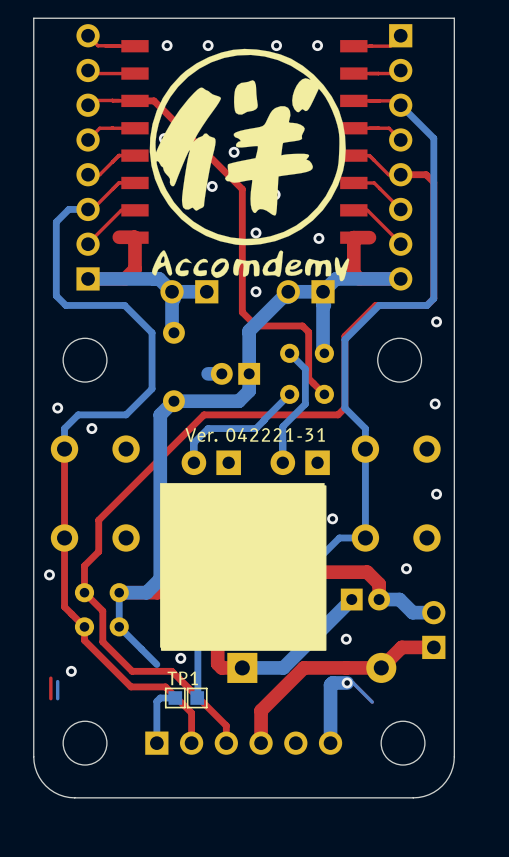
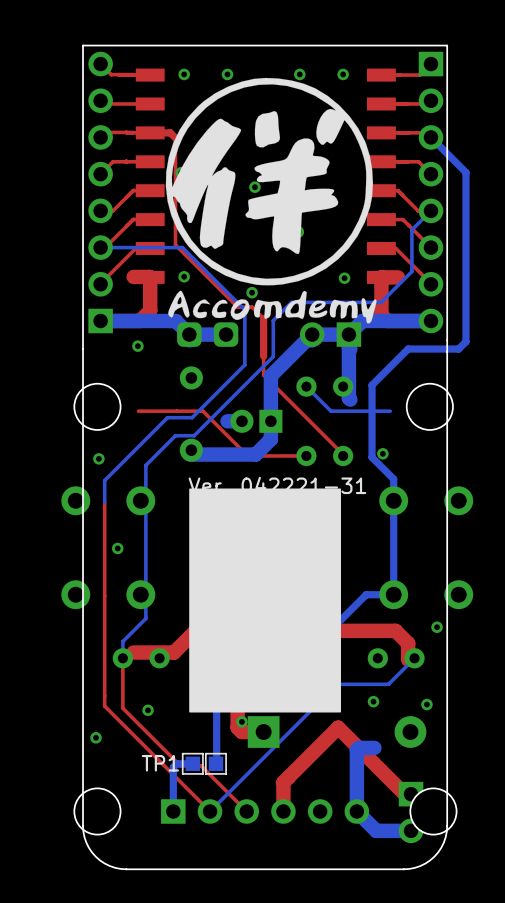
board edge: (71, 18) (33, 18) (33, 756) (39, 777) (54, 792) (69, 797) (112, 797) -> (83, 45) (83, 825) (86, 842) (95, 856) (109, 866) (126, 869)
board edge: (416, 18) (454, 18) (454, 756) (448, 777) (433, 792) (418, 797) (375, 797) -> (447, 45) (447, 825) (443, 842) (434, 856) (420, 866) (403, 869)
top track: (158, 105) (242, 189) (242, 276) -> (175, 138) (175, 244) (237, 307) (252, 307) (263, 318)
top track: (400, 174) (426, 174) (433, 182) (433, 298) (426, 305) (375, 305) (344, 336) (344, 408) (338, 414) (204, 414) (98, 520) (98, 551) (84, 565) (84, 592) (102, 611) (102, 641) (132, 671) (171, 671) (226, 725) (226, 743) -> (122, 658) (122, 708) (180, 765) (200, 765) (246, 811)
bottom track: none -> (431, 210) (411, 229) (411, 271) (381, 302) (291, 302) (273, 320) (273, 356) (194, 435) (175, 435) (145, 465) (145, 618) (122, 641) (122, 658)
via: (212, 186) -> none
bottom track: (88, 209) (68, 209) (56, 222) (56, 295) (65, 305) (124, 305) (152, 332) (152, 388) (126, 414) (78, 414) (64, 428) (64, 449) -> (100, 247) (182, 247) (244, 310) (244, 364) (192, 417) (167, 417) (104, 480) (104, 502)
via: (256, 232) -> none
via: none -> (184, 276)
via: none -> (252, 292)
part footprint: [160, 280, 219, 304] -> [177, 322, 239, 347]
via: (256, 291) -> none
bottom track: (173, 299) (172, 297) (172, 330) (173, 332) -> none
via: none -> (137, 346)
top track: (242, 312) (256, 325) (302, 325) (308, 332) (308, 378) (324, 394) -> (263, 356) (263, 375) (343, 455)
via: (436, 321) -> none
bottom track: none -> (306, 386) (330, 411) (390, 411)
bottom track: (289, 353) (305, 369) (305, 404) (282, 426) (282, 462) -> none
part position: (307, 353) -> (324, 386)
top track: none -> (138, 411) (202, 411) (247, 455) (306, 455)
bottom track: (289, 394) (256, 428) (208, 428) (193, 442) (193, 462) -> none
part position: (307, 394) -> (324, 455)
bottom track: (238, 401) (173, 401) (160, 414) (160, 579) (146, 592) (119, 592) (119, 626) (156, 664) -> (260, 450) (255, 454) (189, 454)
via: (435, 403) -> none
via: none -> (382, 453)
via: (57, 408) -> none
via: none -> (98, 458)
via: (91, 428) -> none
drawing: none -> [189, 488, 341, 713]
top track: (64, 449) (64, 606) (84, 626) (84, 640) (131, 686) (165, 686) (191, 712) (191, 743) -> (104, 502) (104, 706) (210, 811)
part: (211, 462) -> none
part: (300, 462) -> none
drawing: [160, 483, 327, 651] -> none
via: none -> (117, 548)
via: (436, 494) -> none
via: (332, 518) -> none
via: (49, 574) -> none
part footprint: [340, 588, 391, 611] -> [367, 648, 425, 669]
part: (101, 592) -> none
part: none -> (141, 658)
bottom track: none -> (414, 658) (388, 684) (337, 684) (210, 811)
bottom track: (351, 599) (283, 667) (242, 667) -> none
bottom track: (379, 599) (399, 599) (412, 612) (433, 612) -> none
part: (101, 626) -> none
part rotation: 0° (433, 630) -> 180° (411, 812)
part position: (433, 630) -> (411, 812)
via: none -> (426, 704)
via: none -> (148, 710)
top track: (433, 647) (401, 647) (381, 667) (303, 667) (261, 710) (261, 715) -> (411, 794) (404, 794) (338, 727) (283, 782)
via: (180, 658) -> none
via: none -> (241, 721)
via position: (71, 671) -> (96, 737)
top track: (50, 678) (50, 698) -> none
TP1 name position: TP1 (182, 678) -> TP1 (160, 763)
bottom track: (57, 681) (57, 698) -> none
bottom track: (347, 682) (353, 682) (372, 702) -> none
via: (347, 682) -> none
bottom track: none -> (356, 811) (376, 830) (411, 830)

